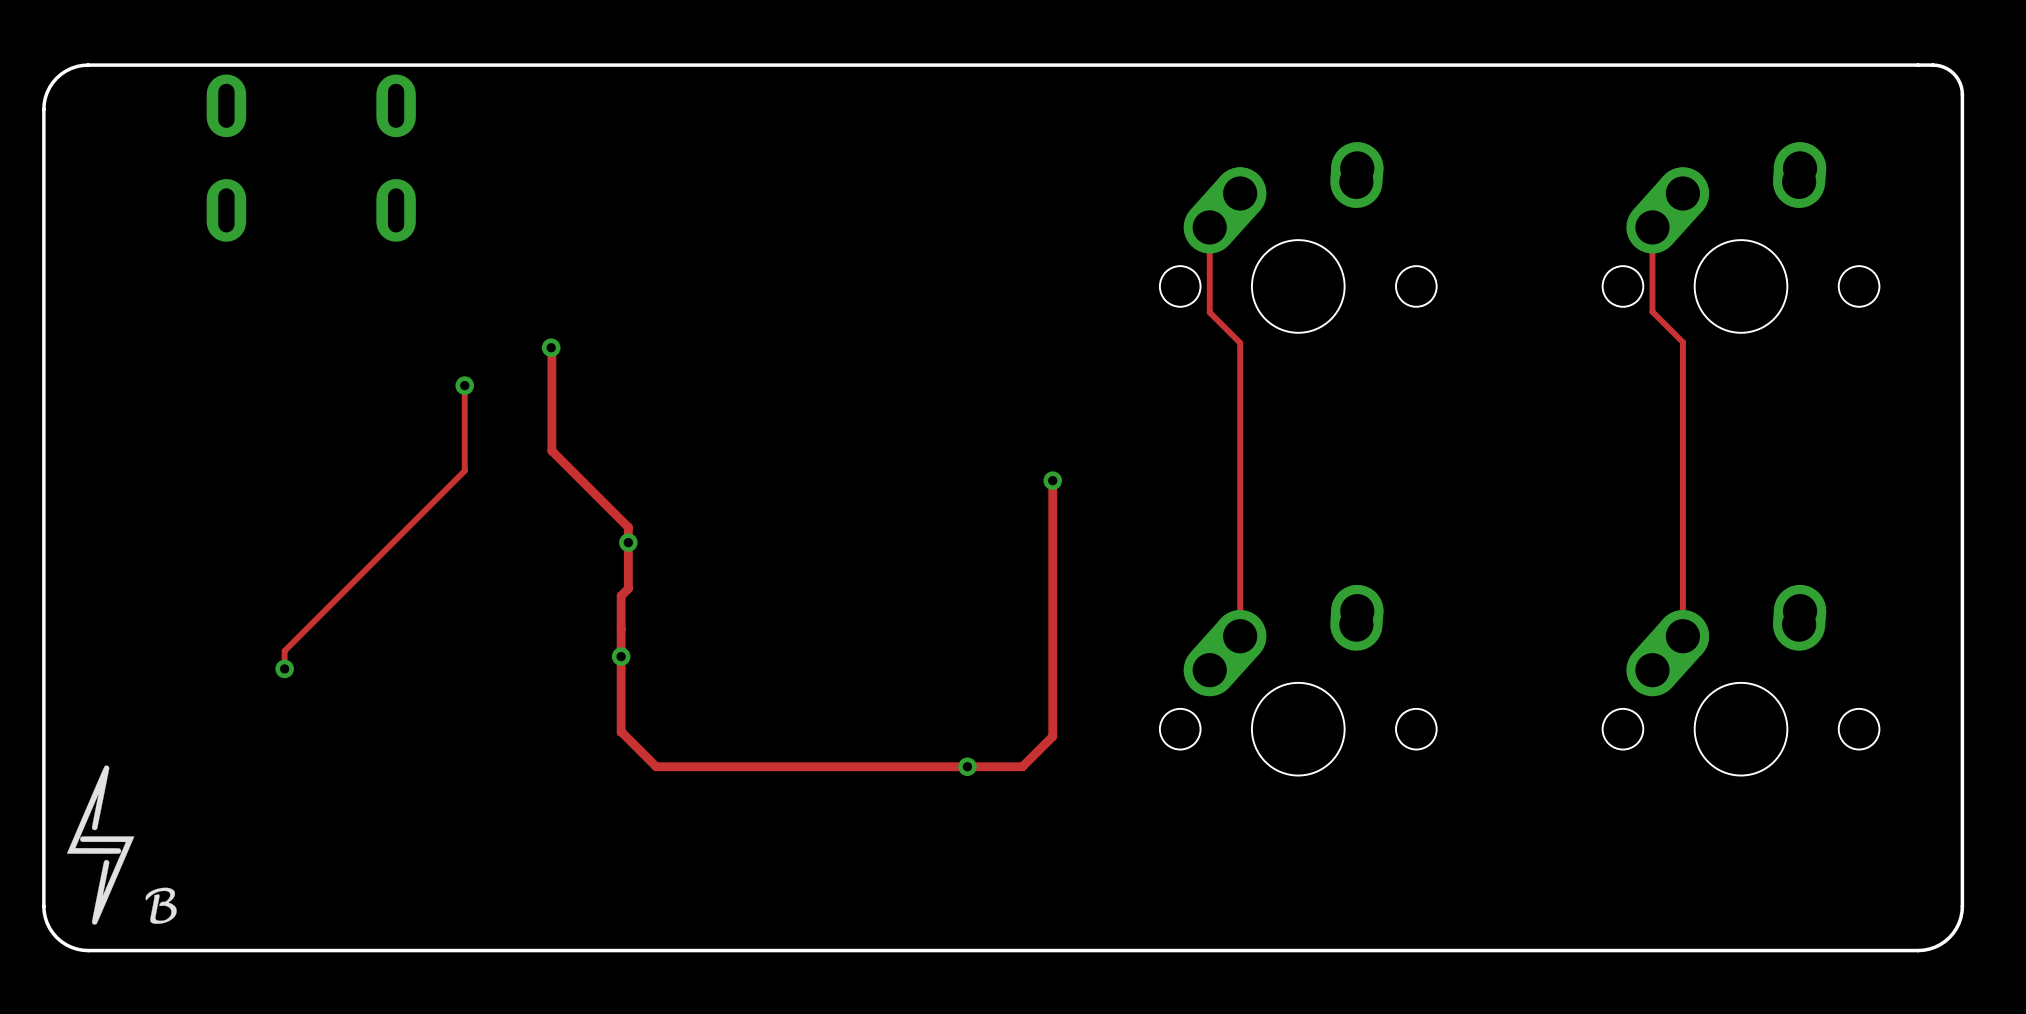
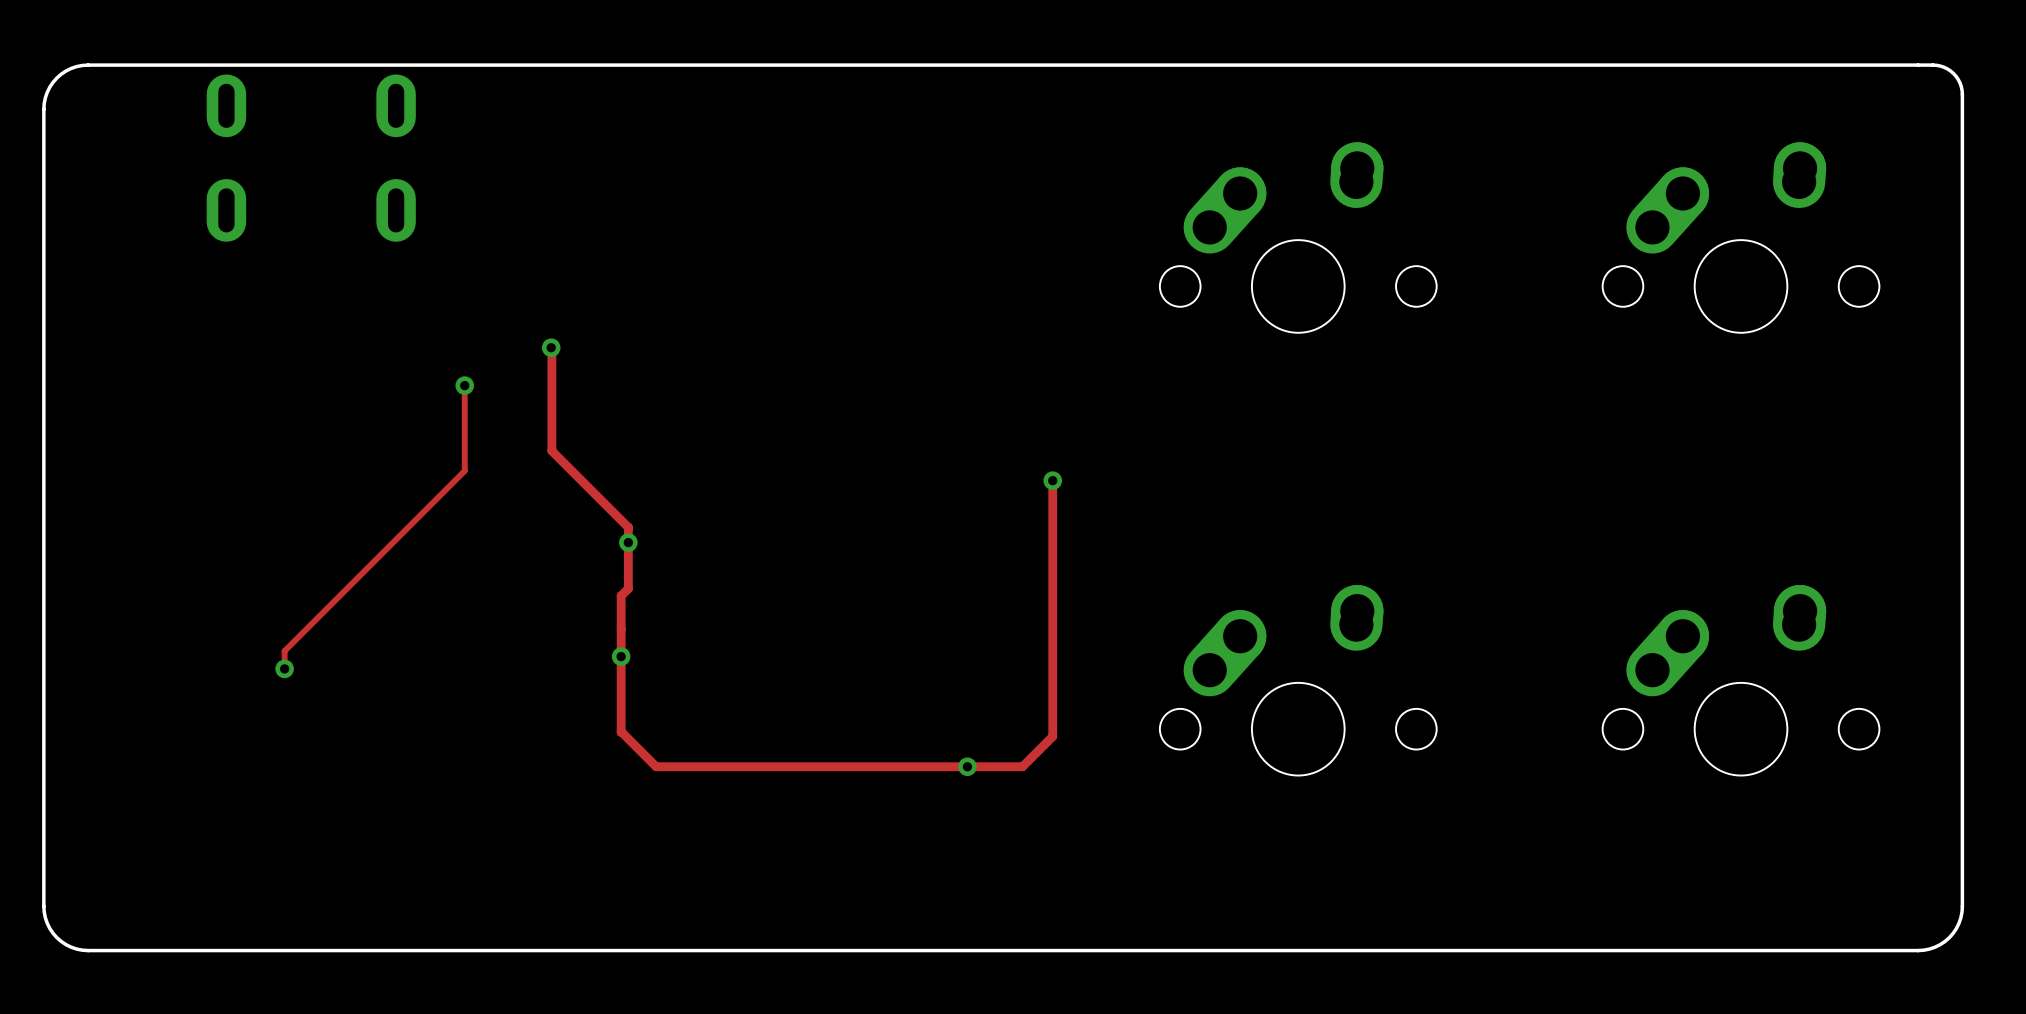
track: (1209, 227) (1209, 312) (1240, 342) (1240, 636) -> none
track: (1652, 227) (1652, 311) (1682, 342) (1682, 636) -> none
drawing: [66, 765, 177, 925] -> none

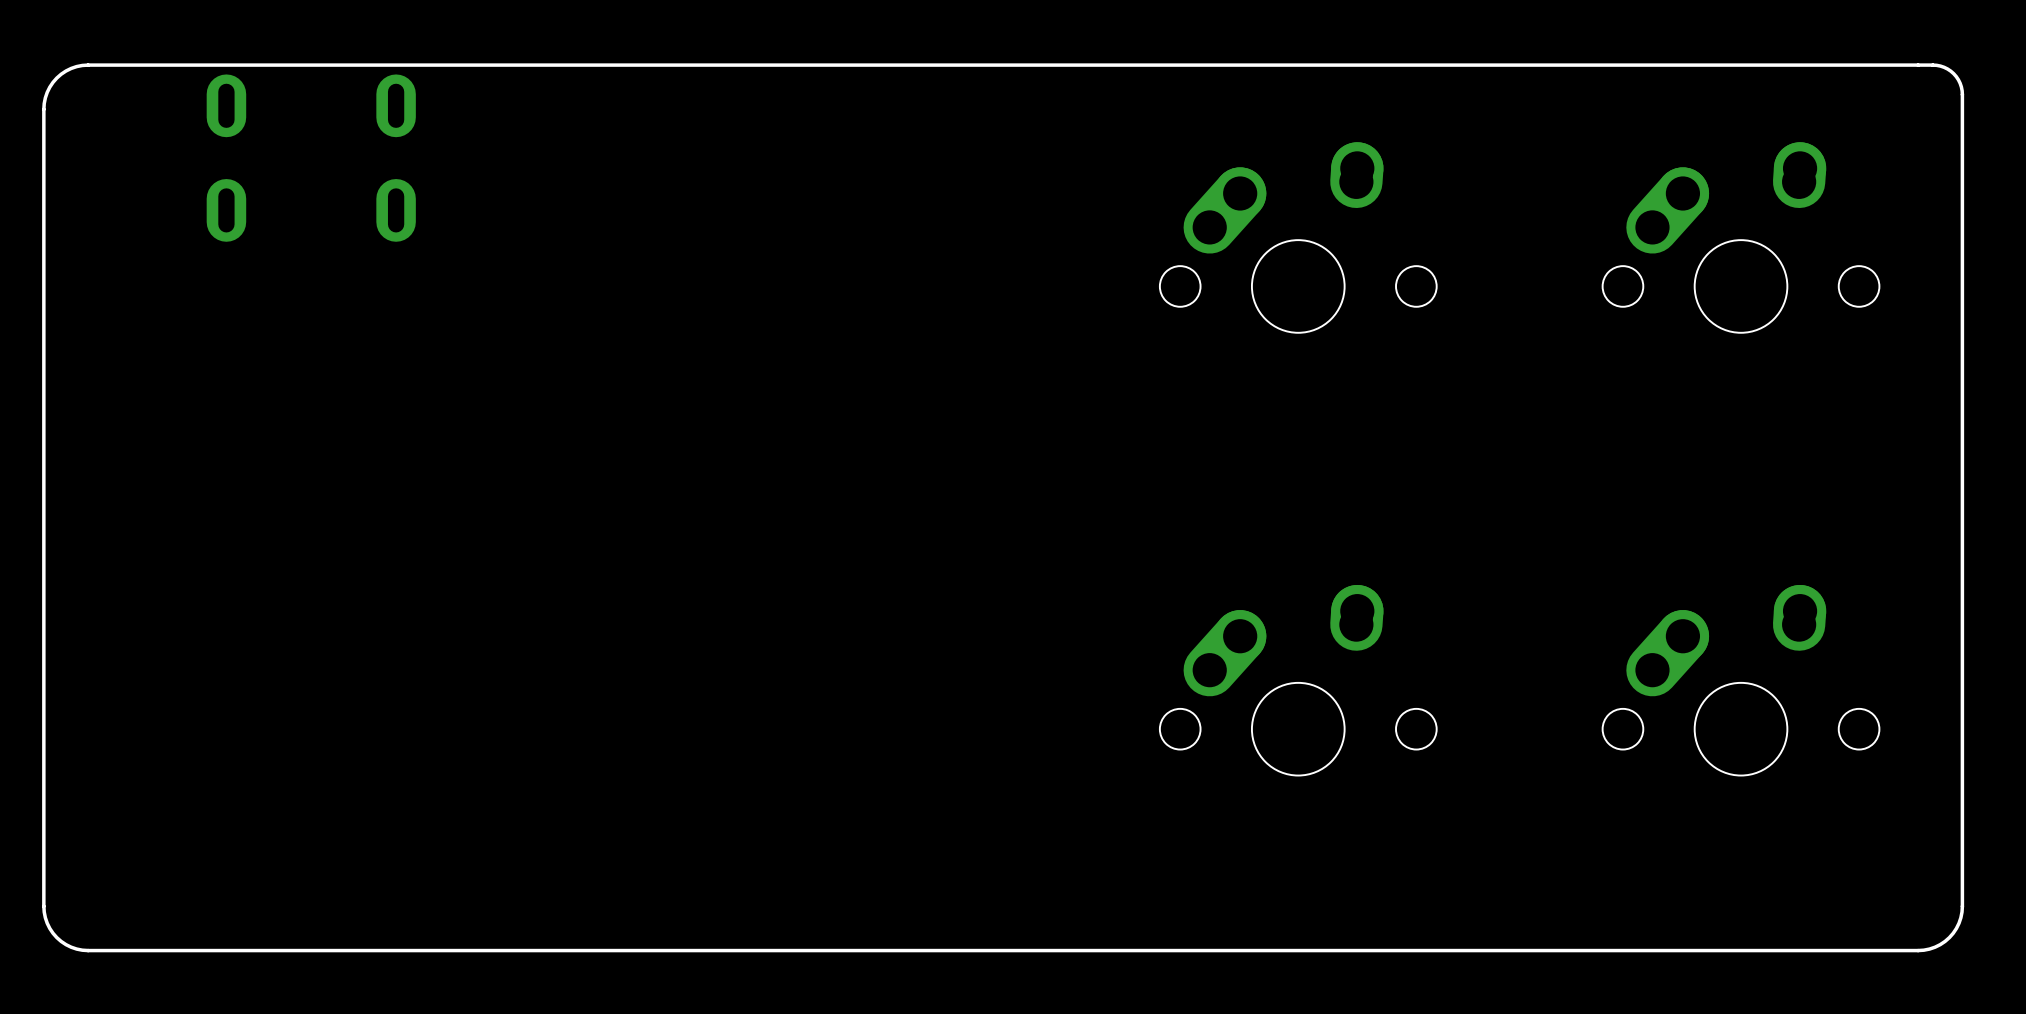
track: (551, 347) (551, 450) (628, 527) (628, 588) (621, 595) (621, 732) (656, 766) (1022, 766) (1052, 736) (1052, 480) -> none
via: (551, 347) -> none
track: (464, 385) (464, 470) (284, 651) (284, 668) -> none
via: (464, 385) -> none
via: (1052, 480) -> none
via: (628, 542) -> none
via: (621, 656) -> none
via: (284, 668) -> none
via: (967, 766) -> none

